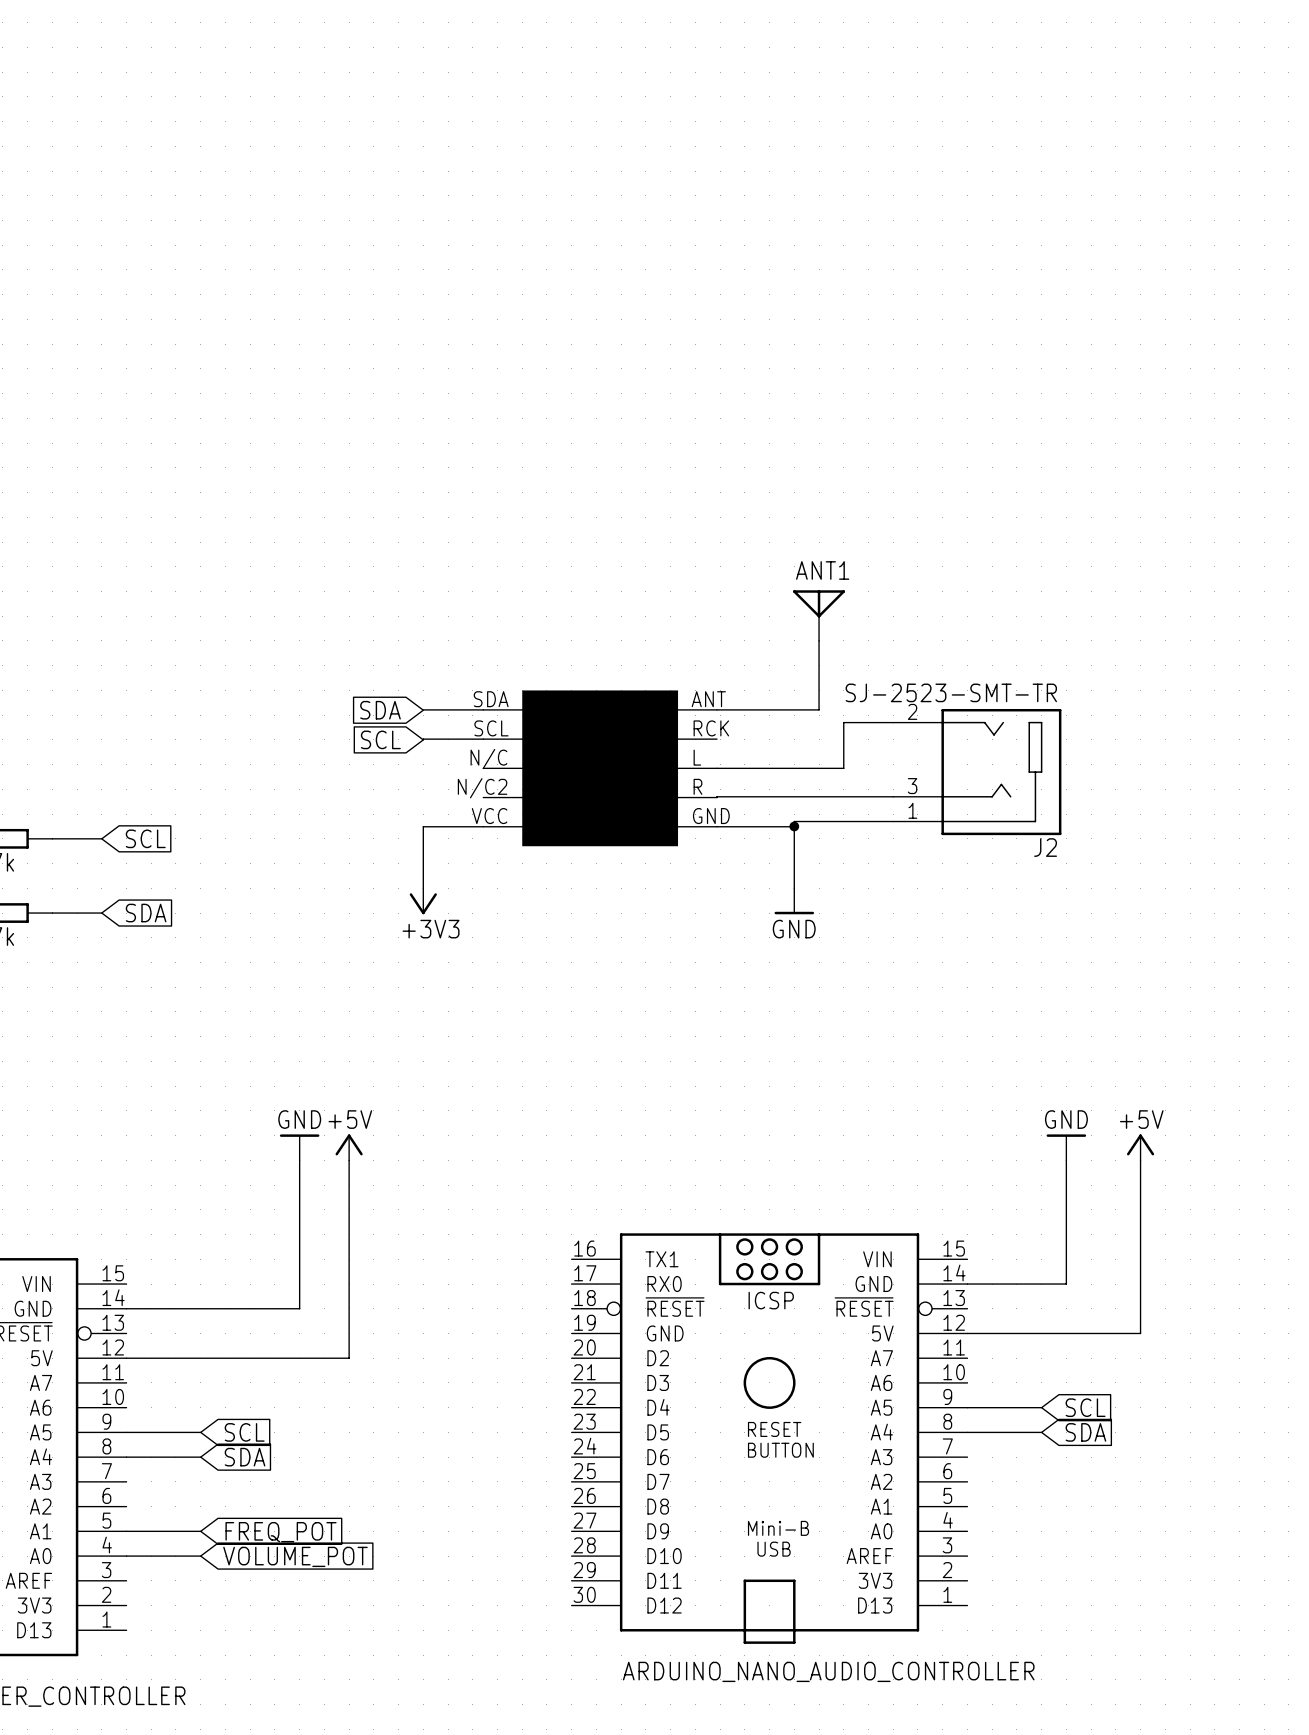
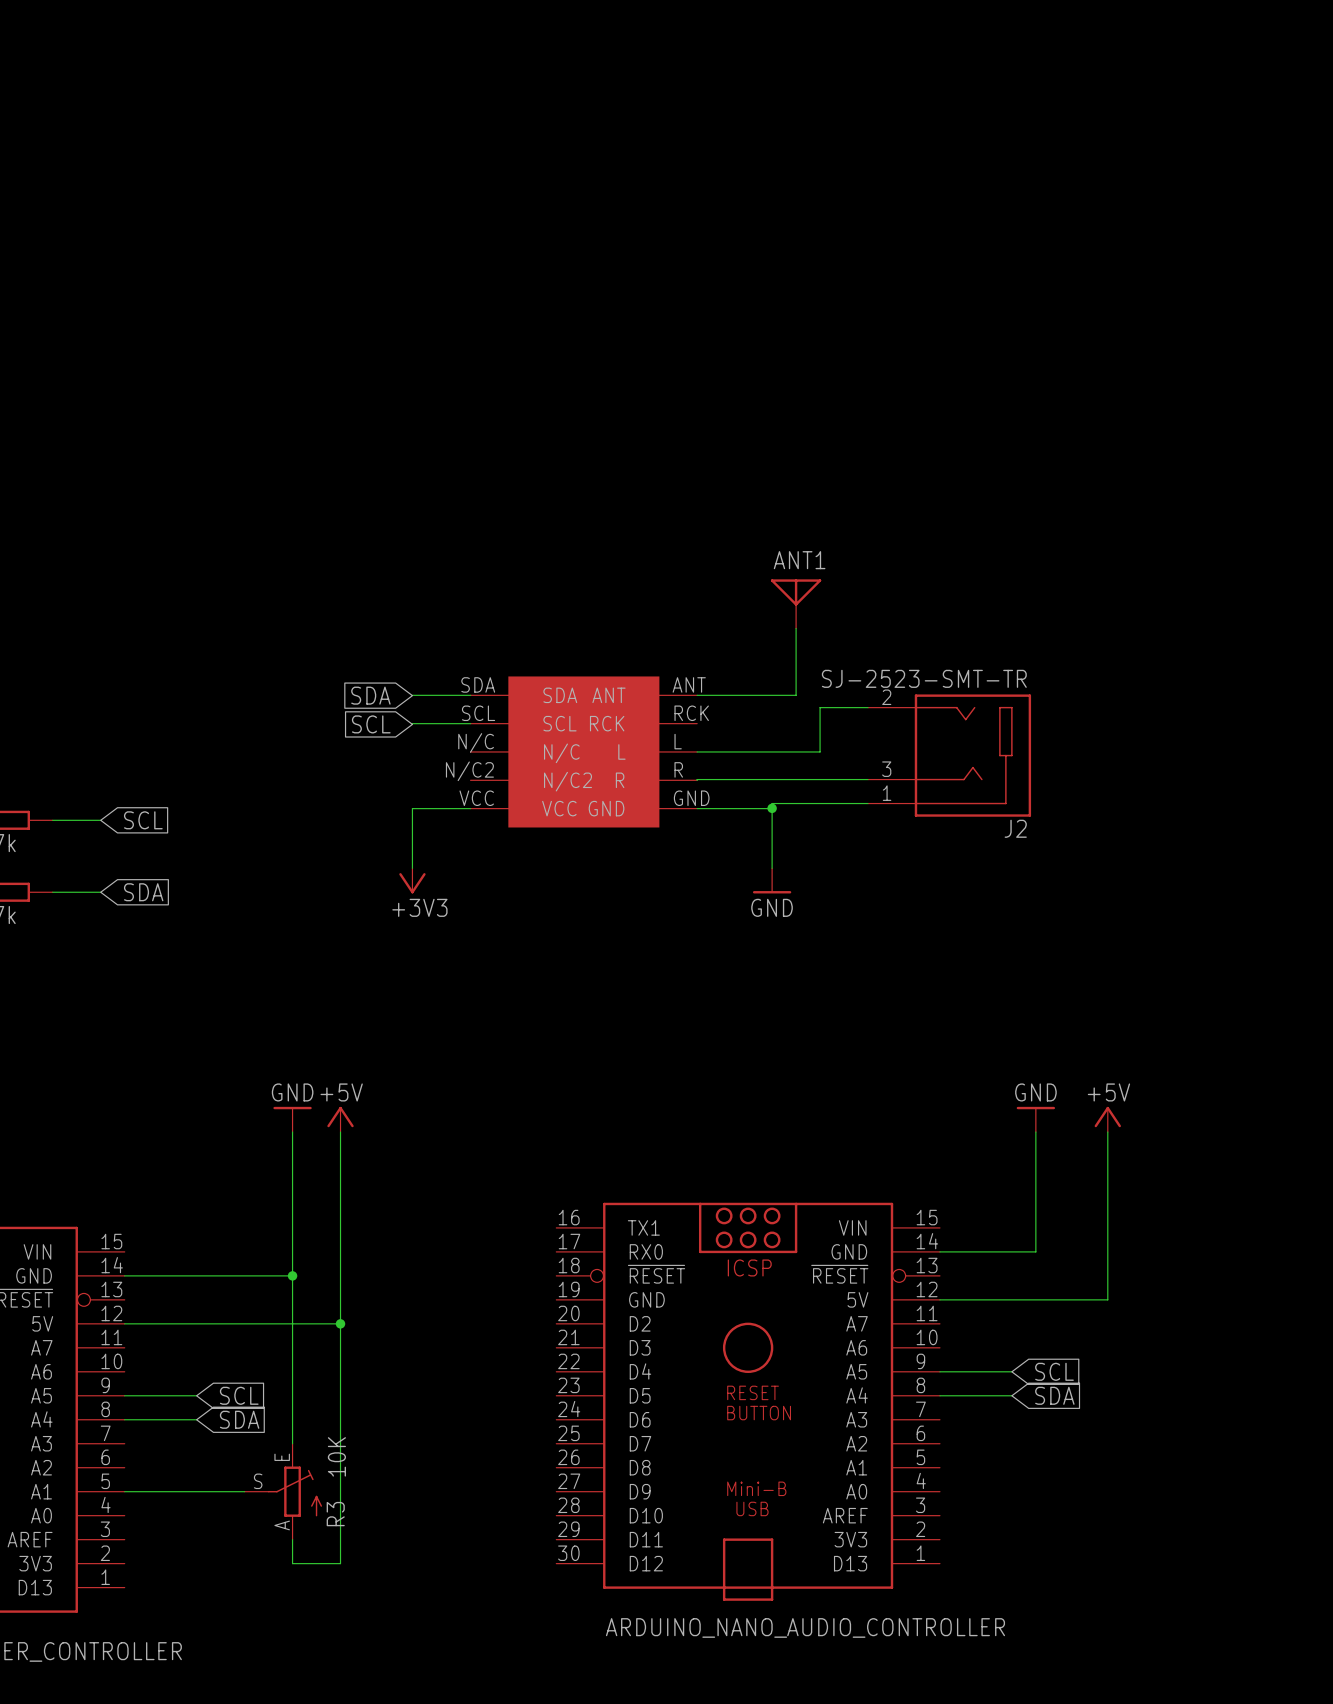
wire: none -> (292, 1275) (292, 1443)
junction: none -> (292, 1275)
wire: none -> (340, 1323) (340, 1563) (292, 1563) (292, 1539)
junction: none -> (340, 1323)
wire: none -> (196, 1491) (244, 1491)
R3: none -> 10K (283, 1491)
global label: FREQ_POT (281, 1532) -> none
wire: (126, 1556) (200, 1556) -> none
global label: VOLUME_POT (295, 1556) -> none

